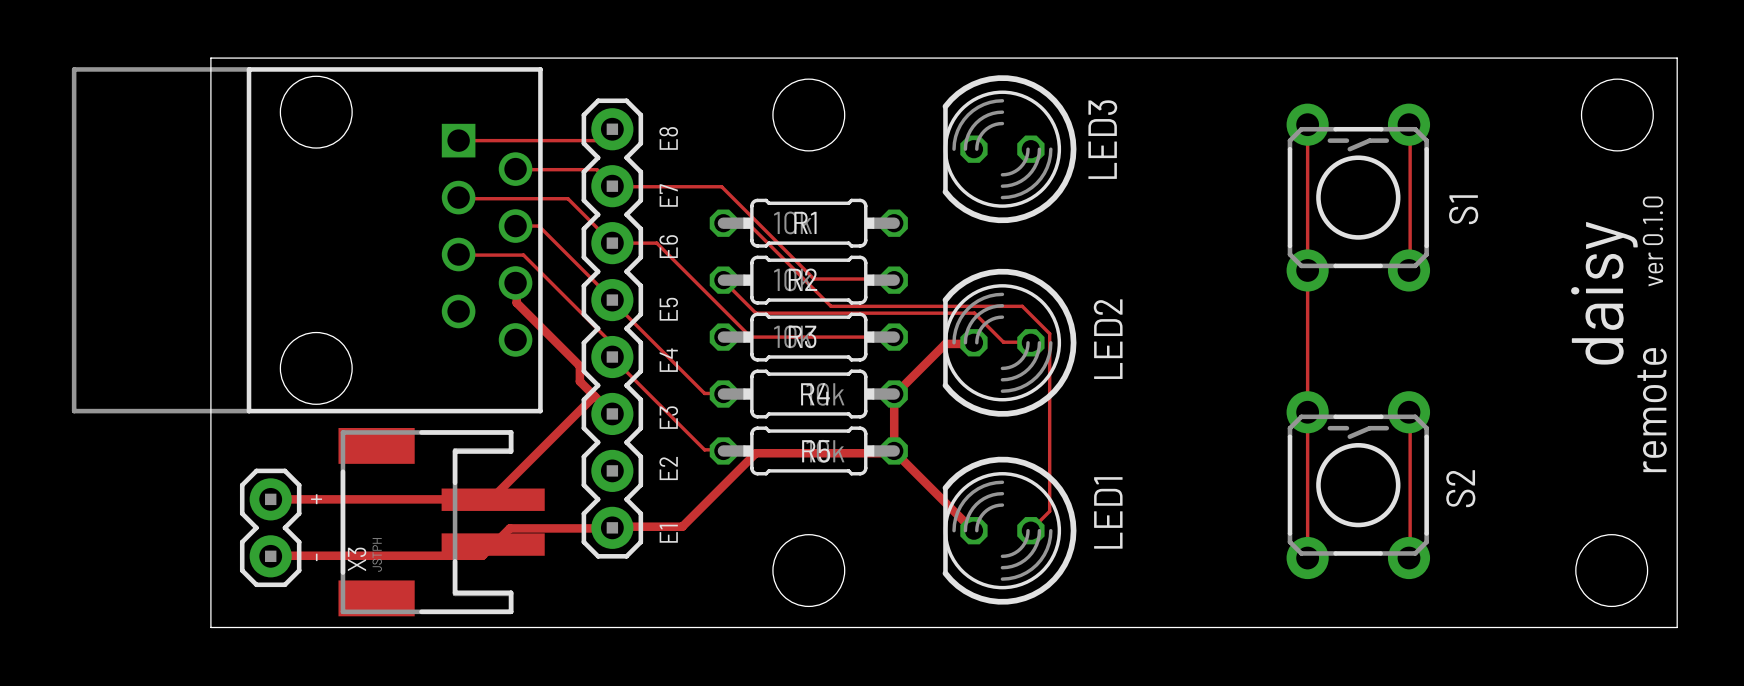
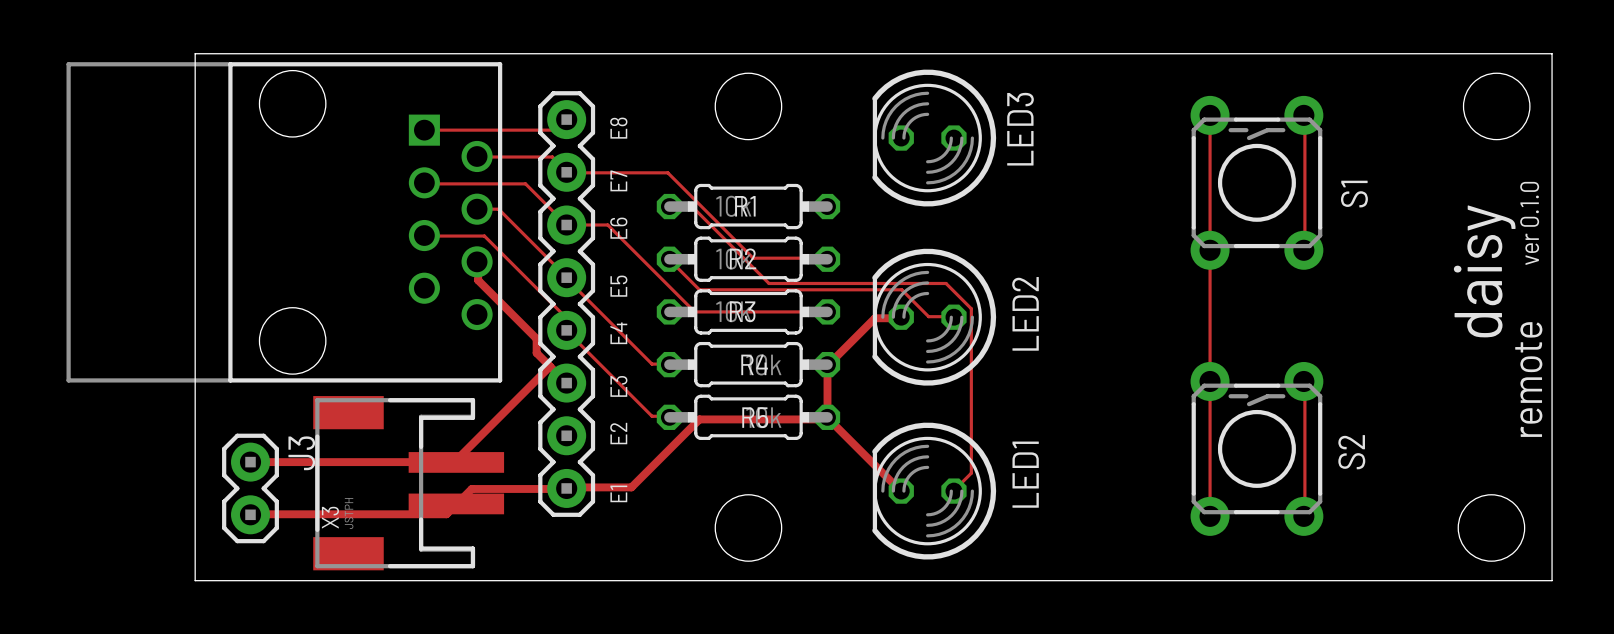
J3 name: none -> J3 (301, 453)
text: + (316, 499) -> none
text: - (316, 557) -> none

